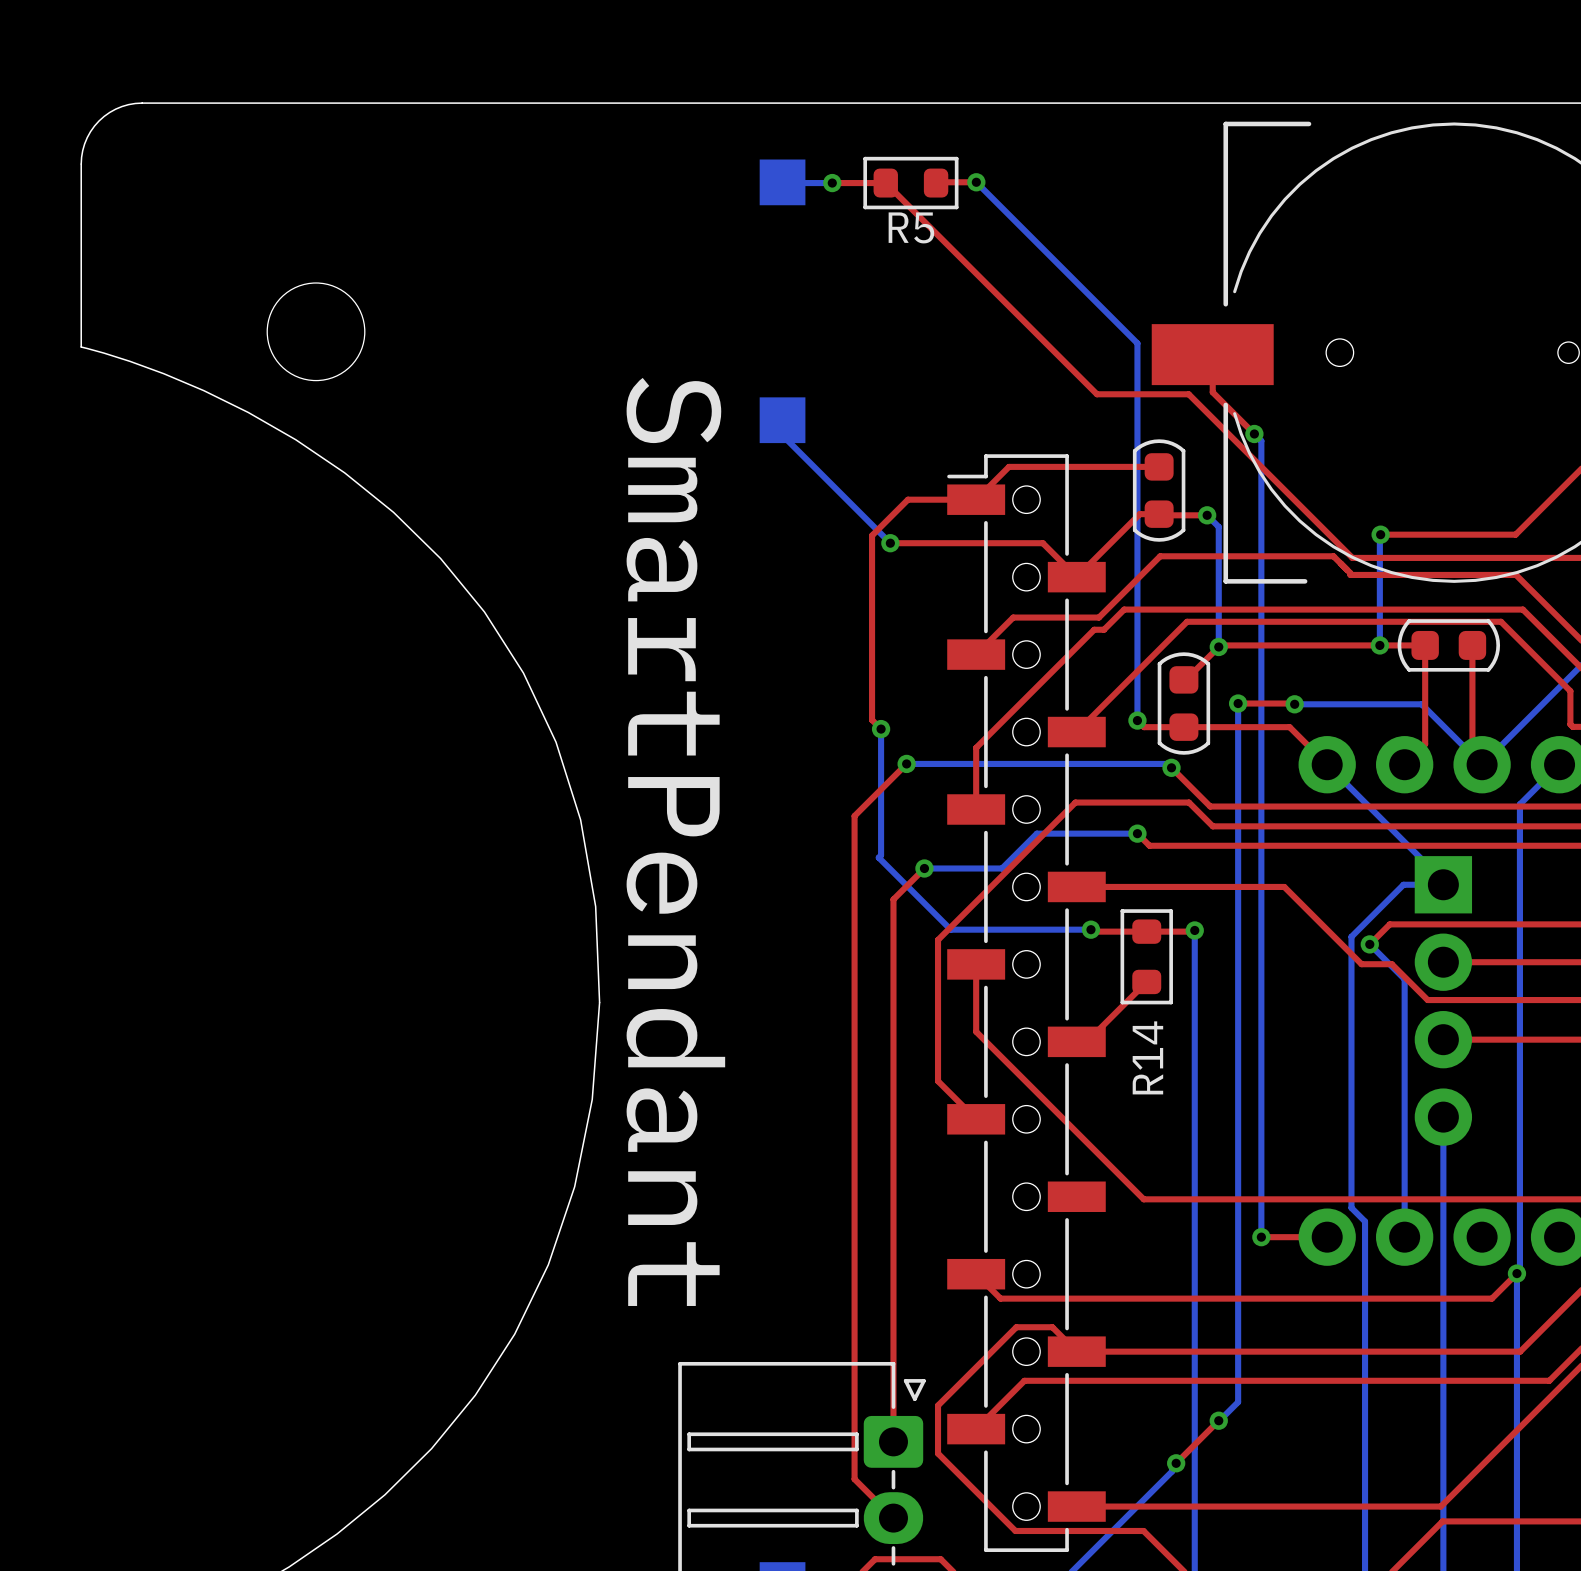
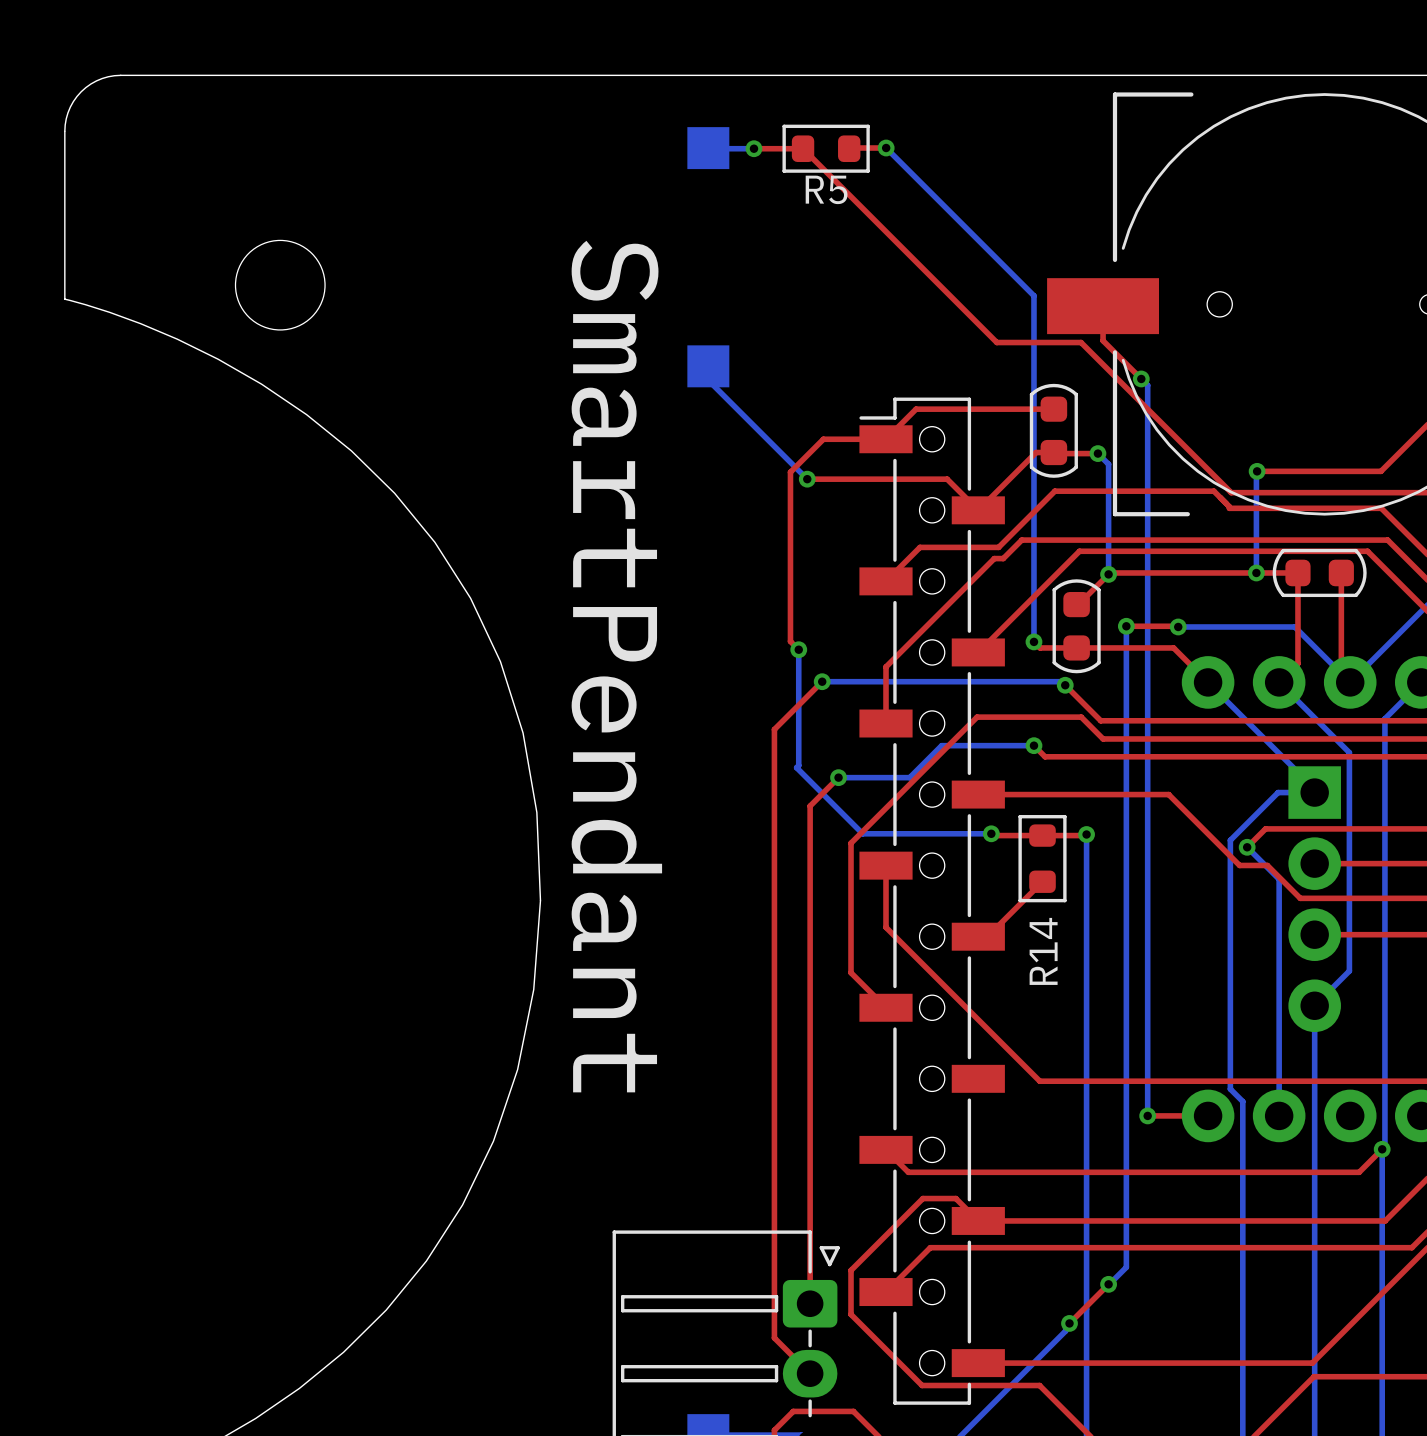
bottom track: none -> (1279, 682) (1349, 752) (1349, 971) (1314, 1005)
text position: SmartPendant (675, 841) -> SmartPendant (616, 666)

